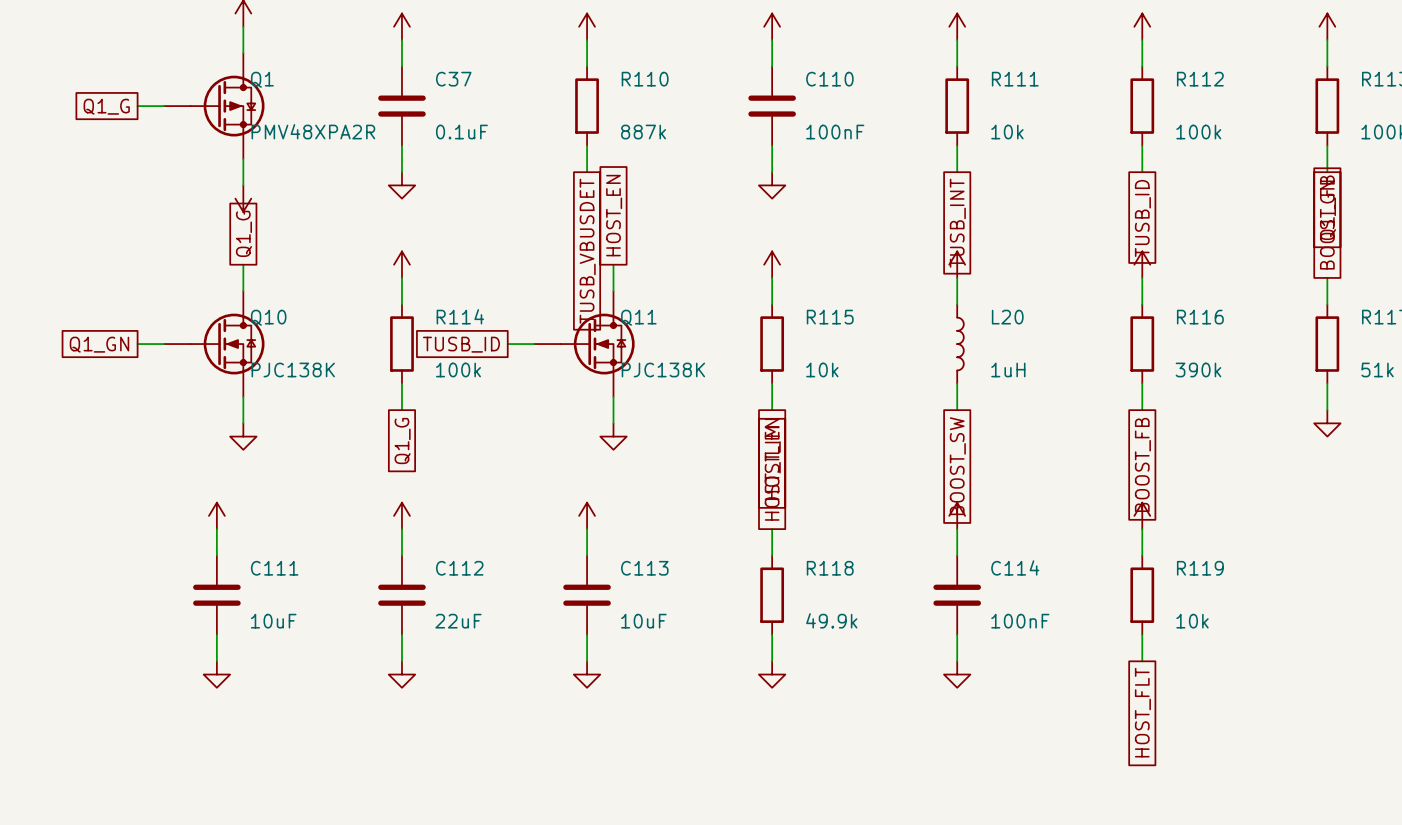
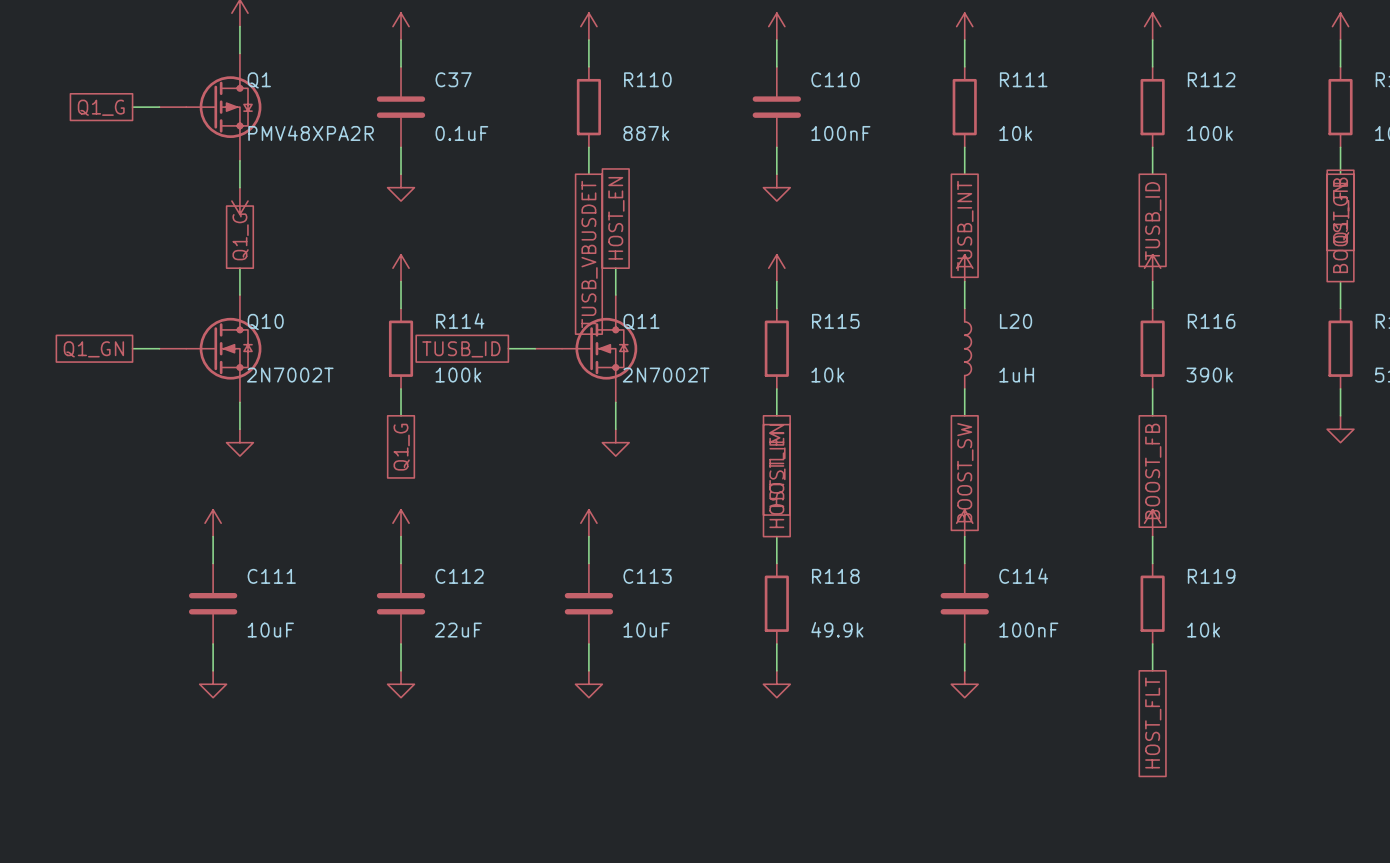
Q10 value: PJC138K (293, 369) -> 2N7002T (290, 375)
Q11 value: PJC138K (663, 369) -> 2N7002T (666, 375)

